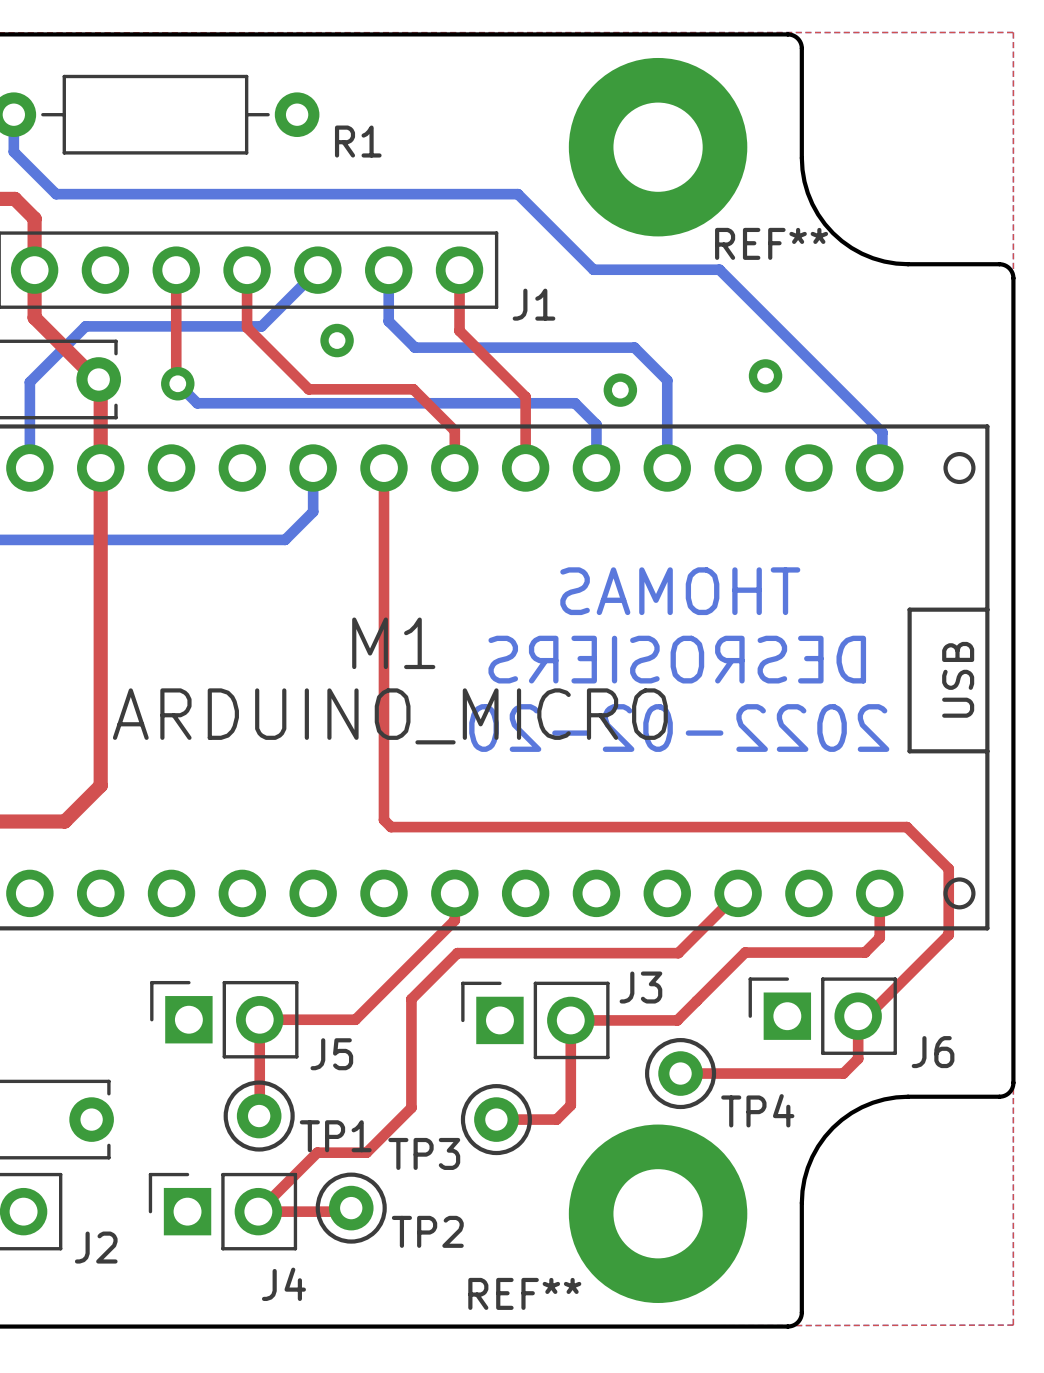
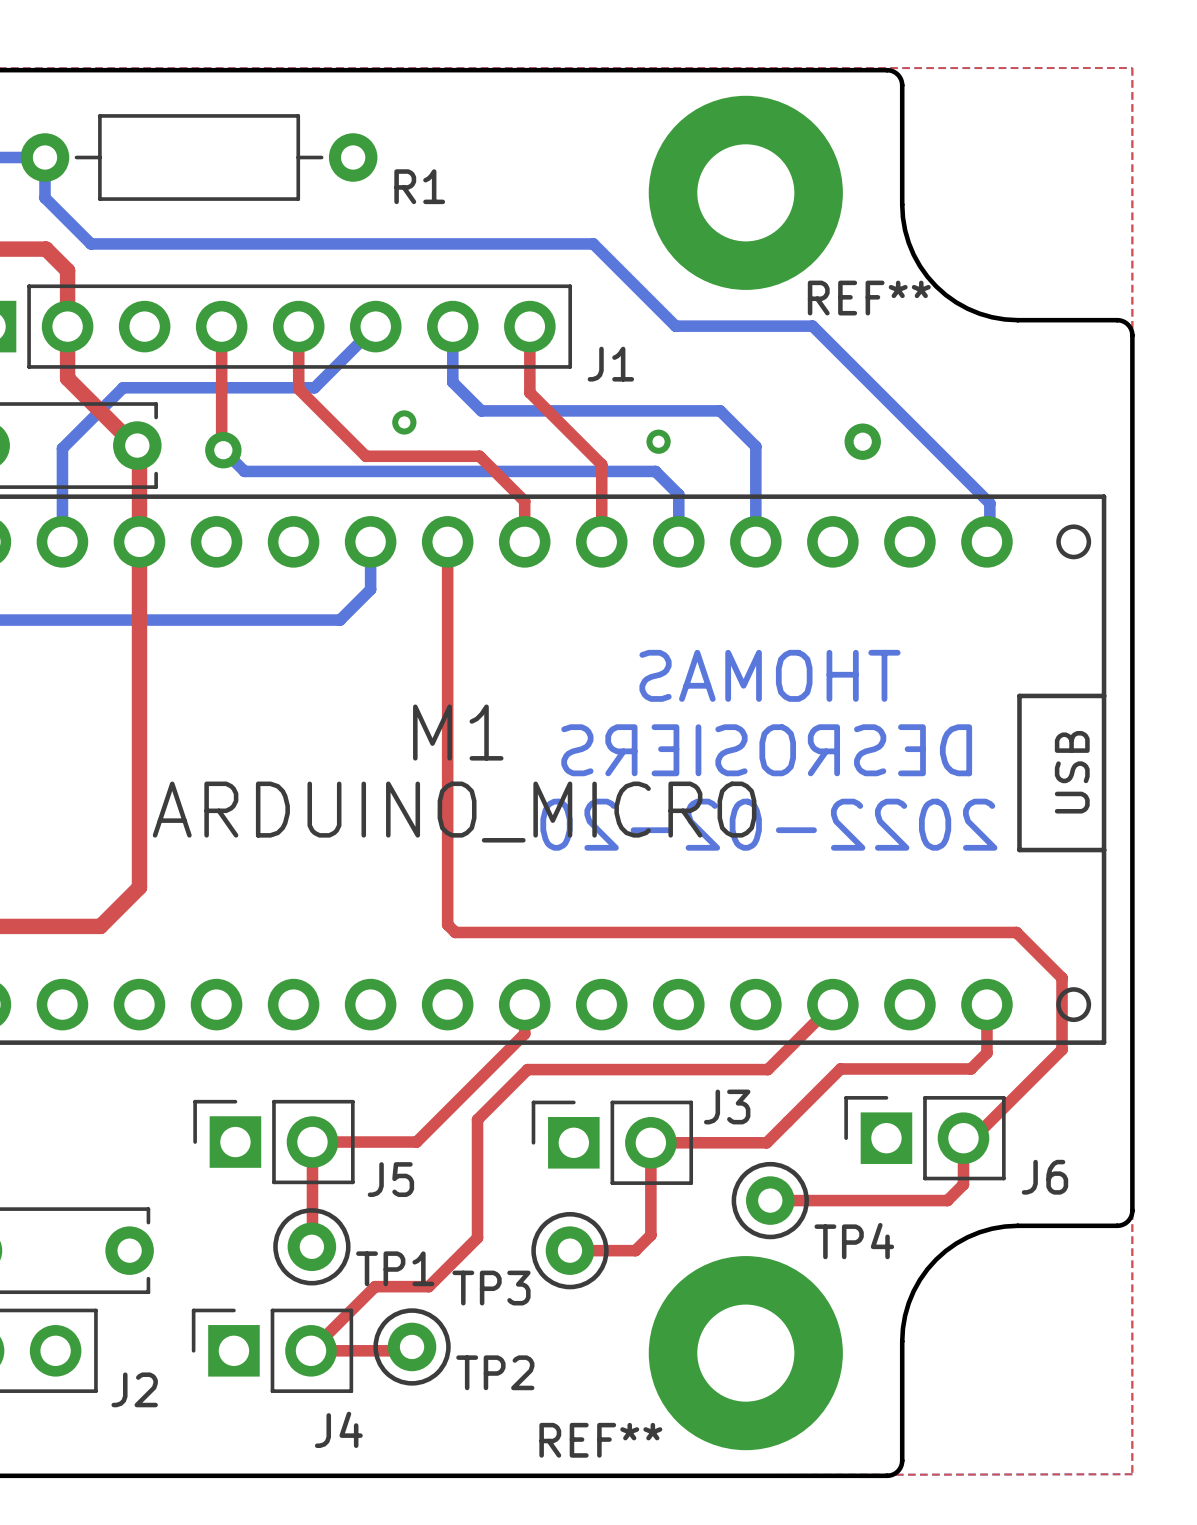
via size: [320, 323, 354, 358] -> [392, 410, 417, 435]
via: none -> (658, 441)
via: (620, 390) -> none

